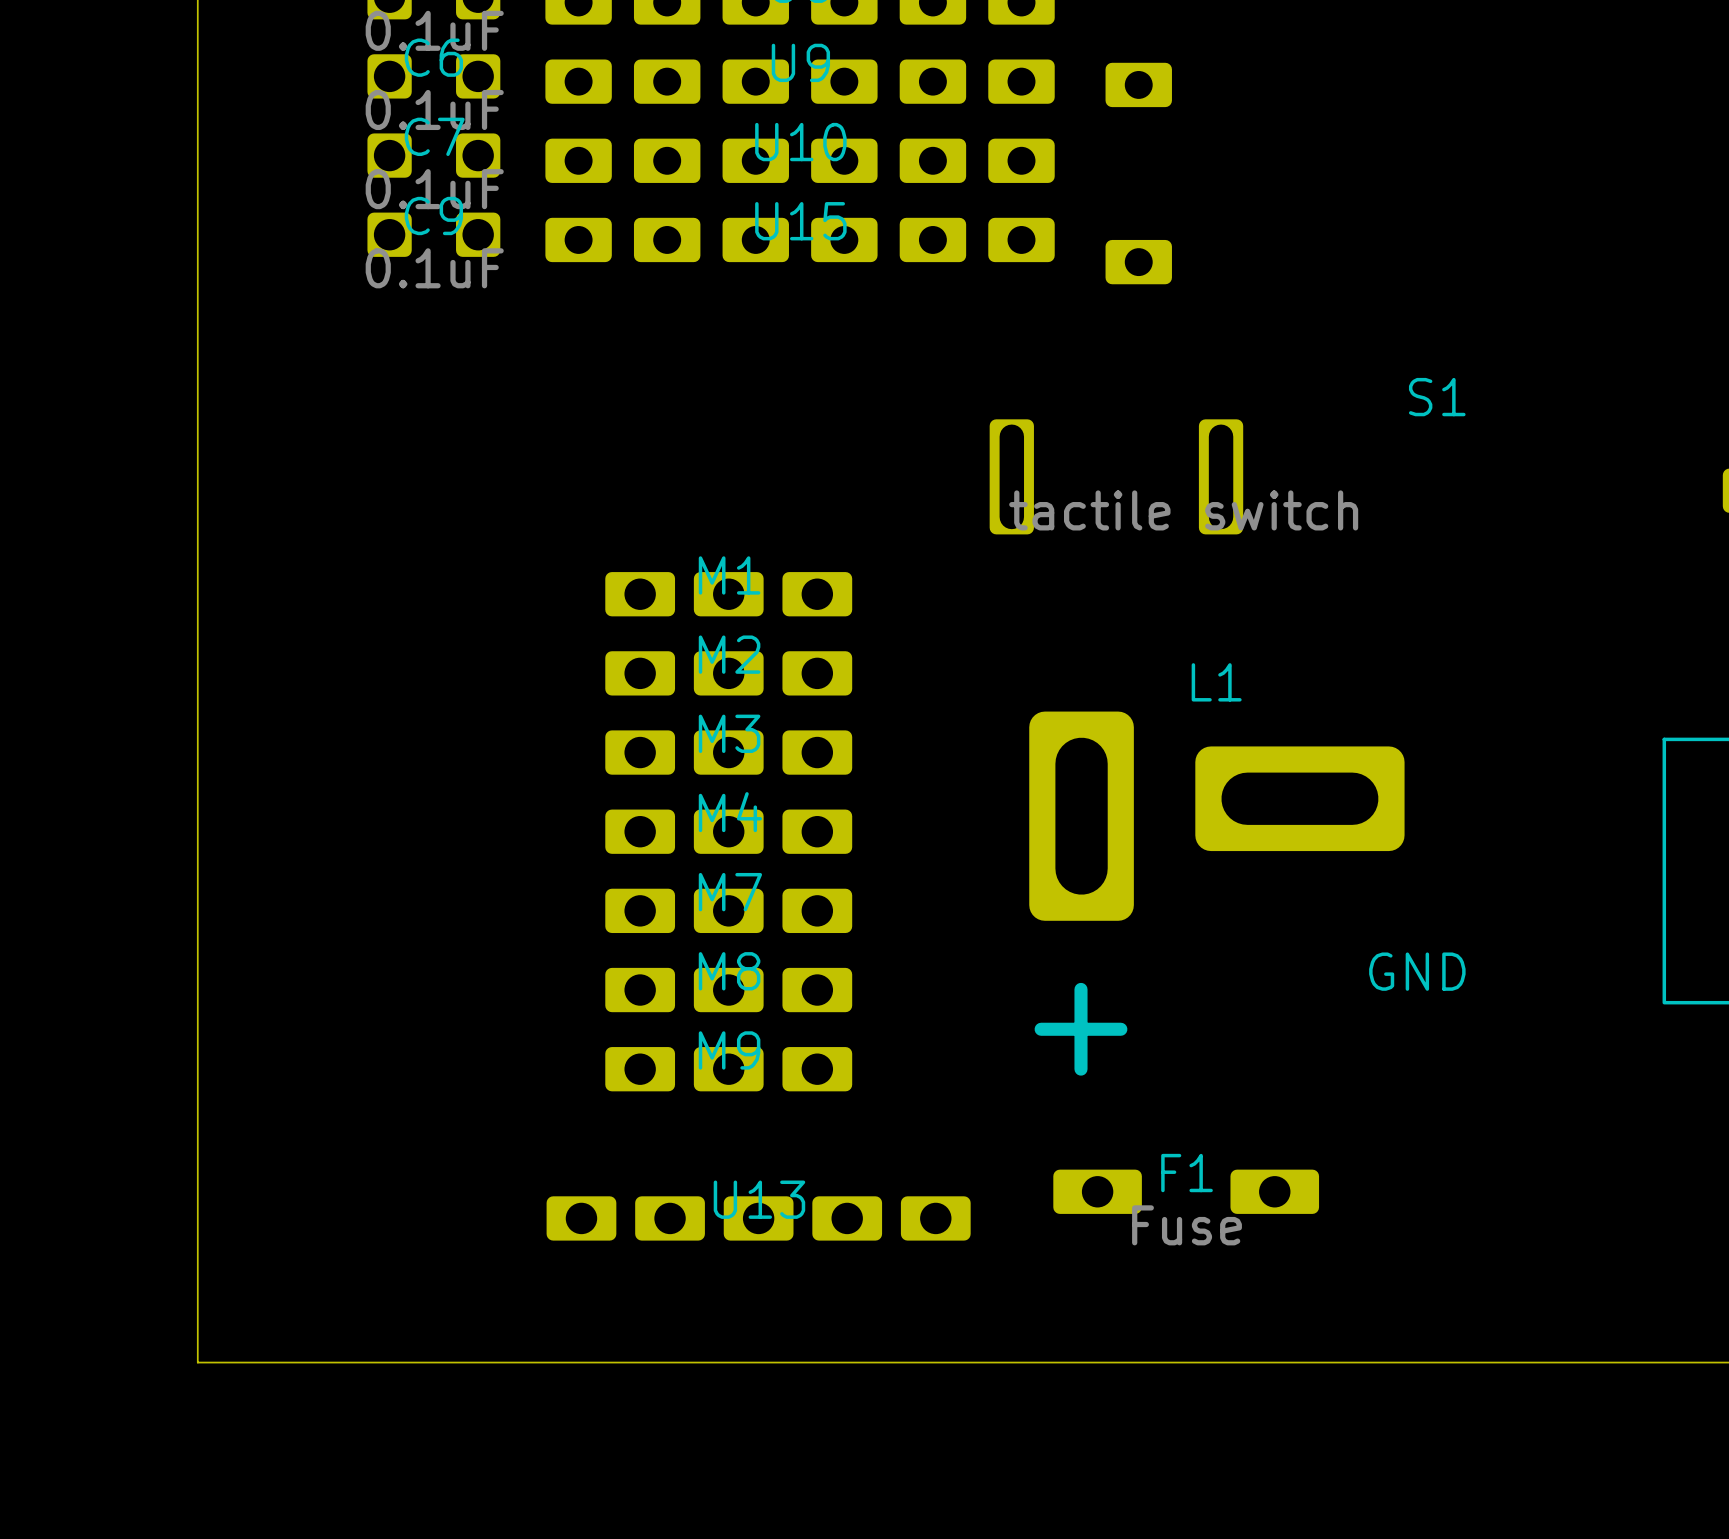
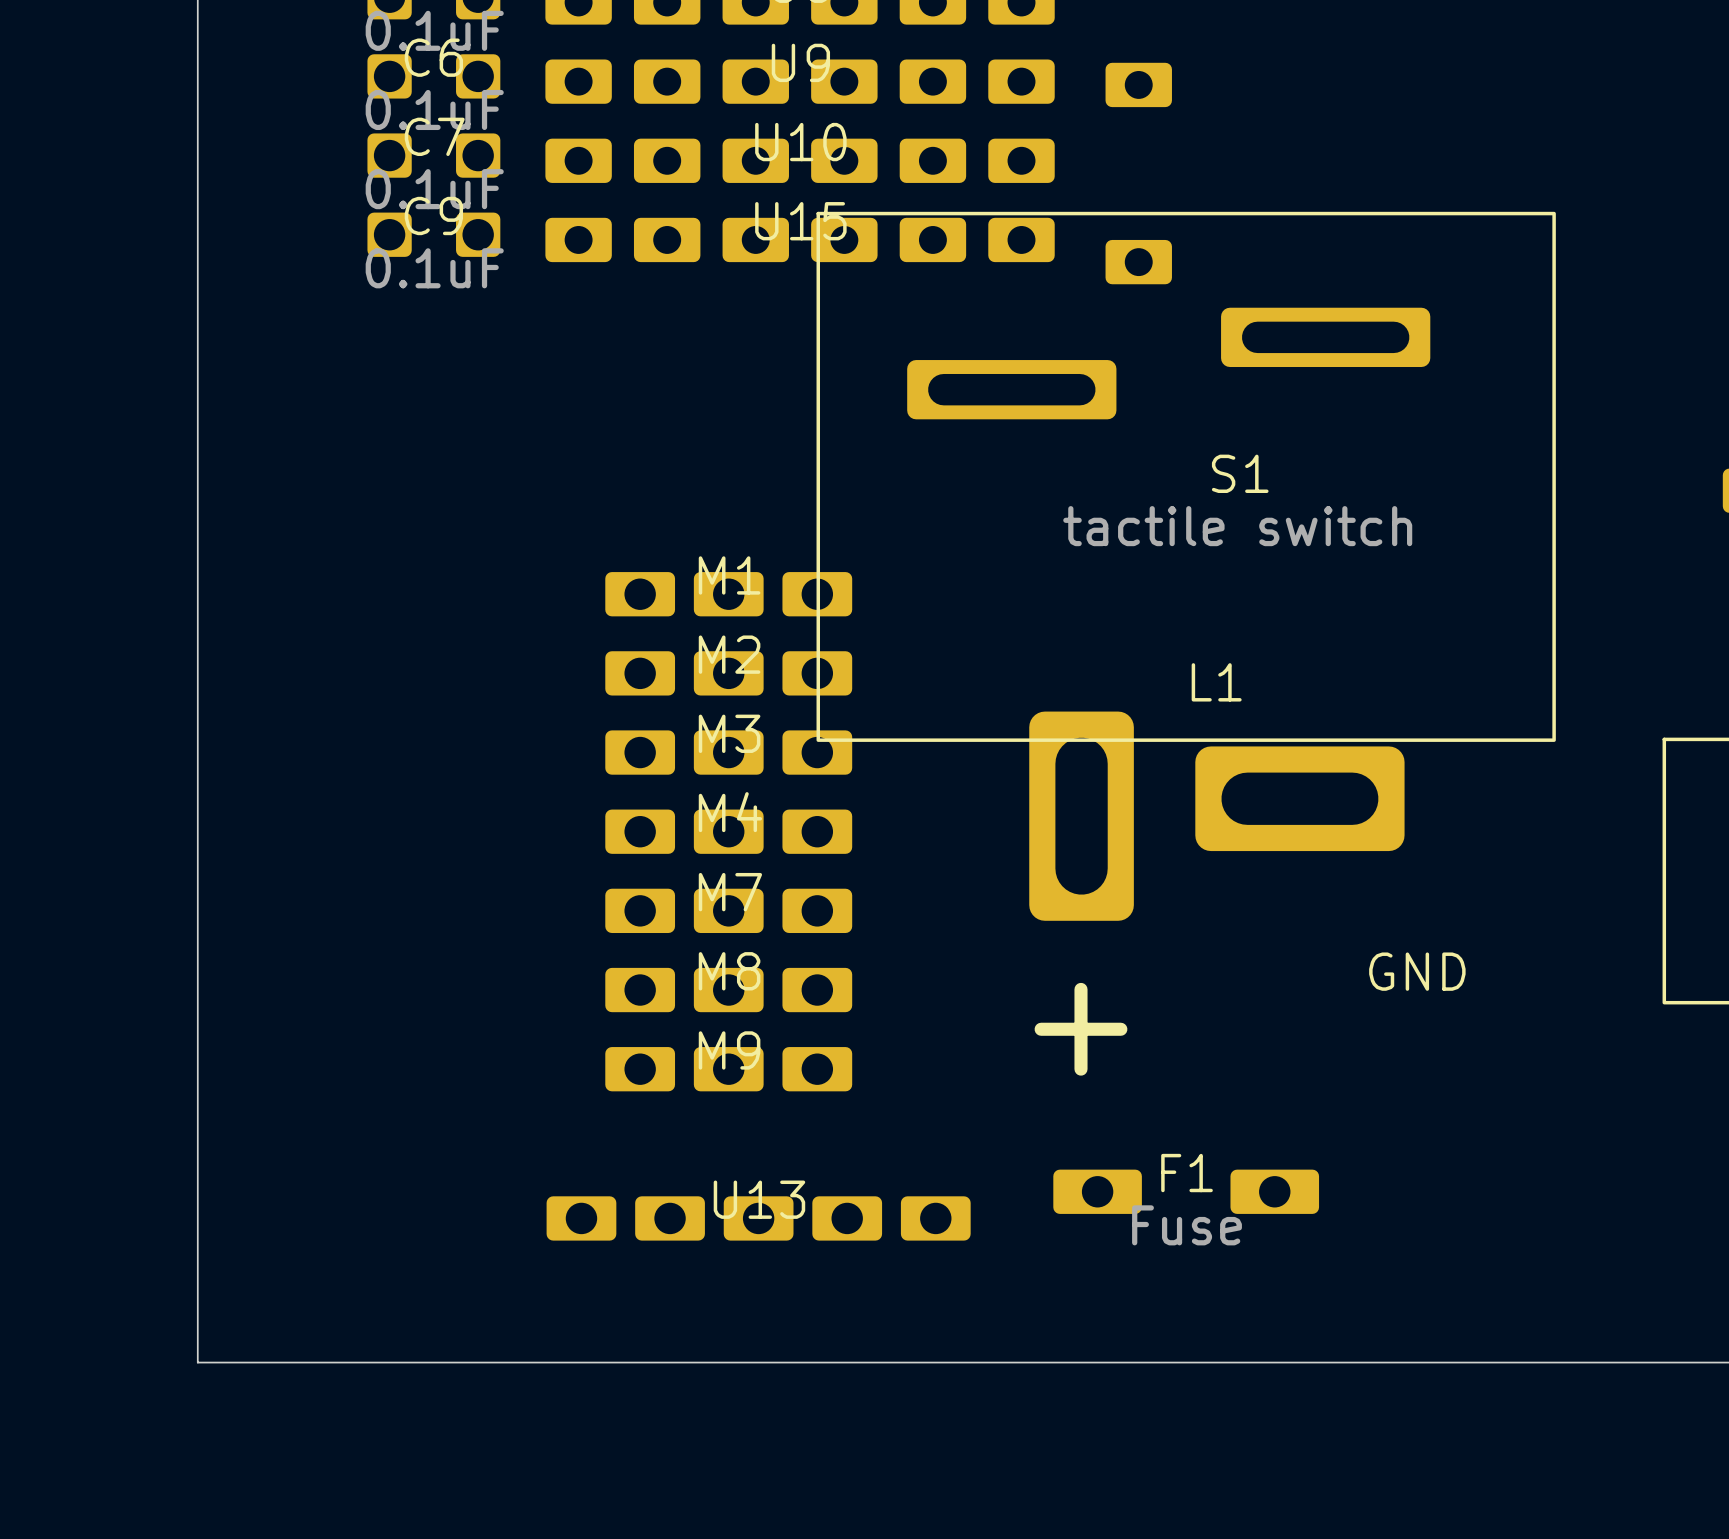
S1 name position: S1 (1437, 397) -> S1 (1240, 473)
S1 footprint: [989, 419, 1244, 535] -> [816, 211, 1556, 742]

